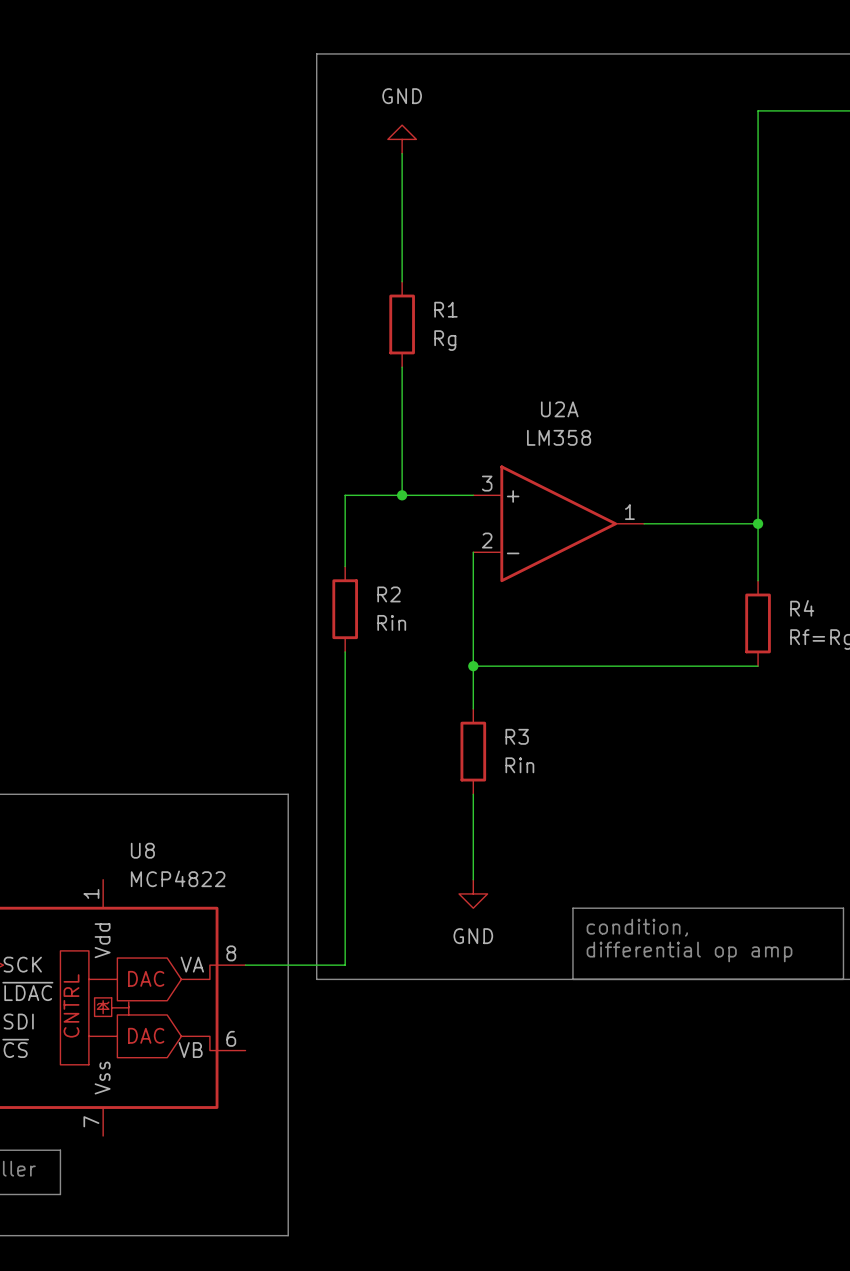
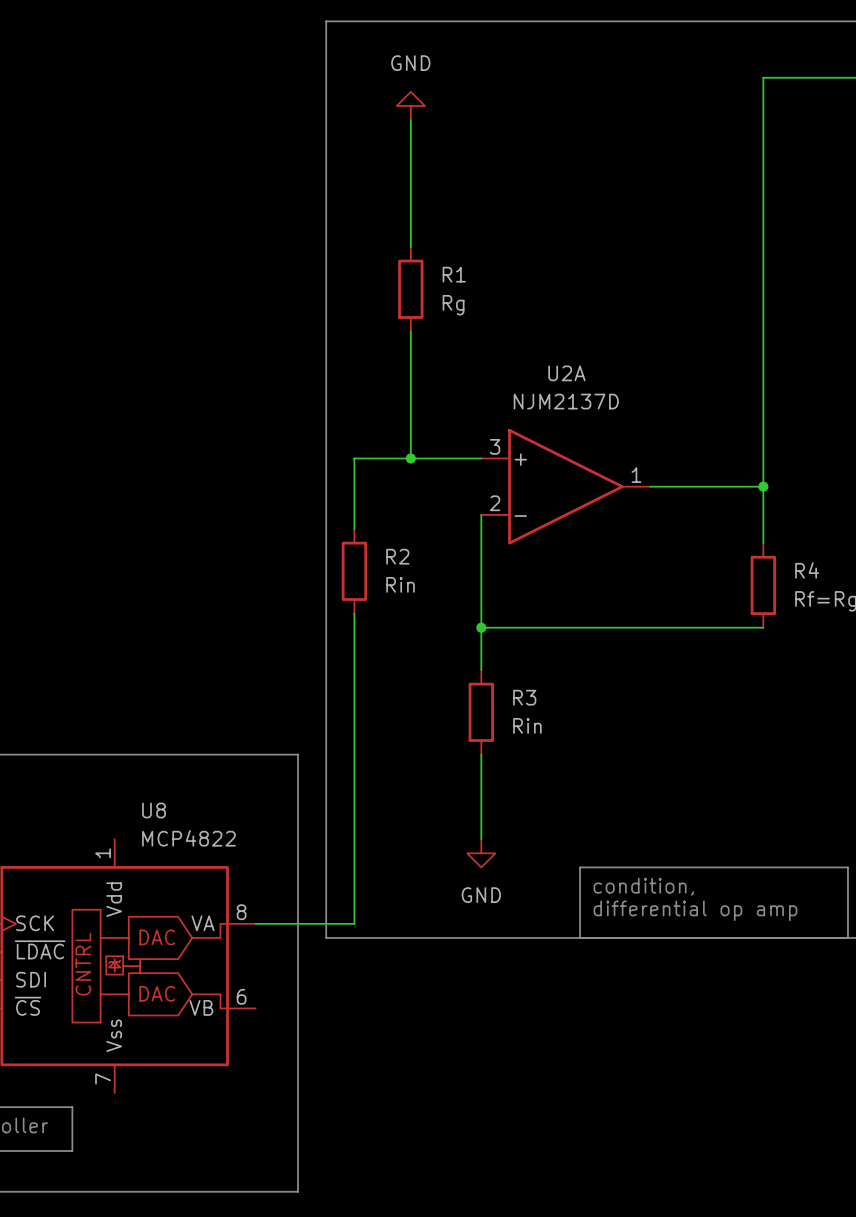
U2A value: LM358 (559, 437) -> NJM2137D (566, 401)

